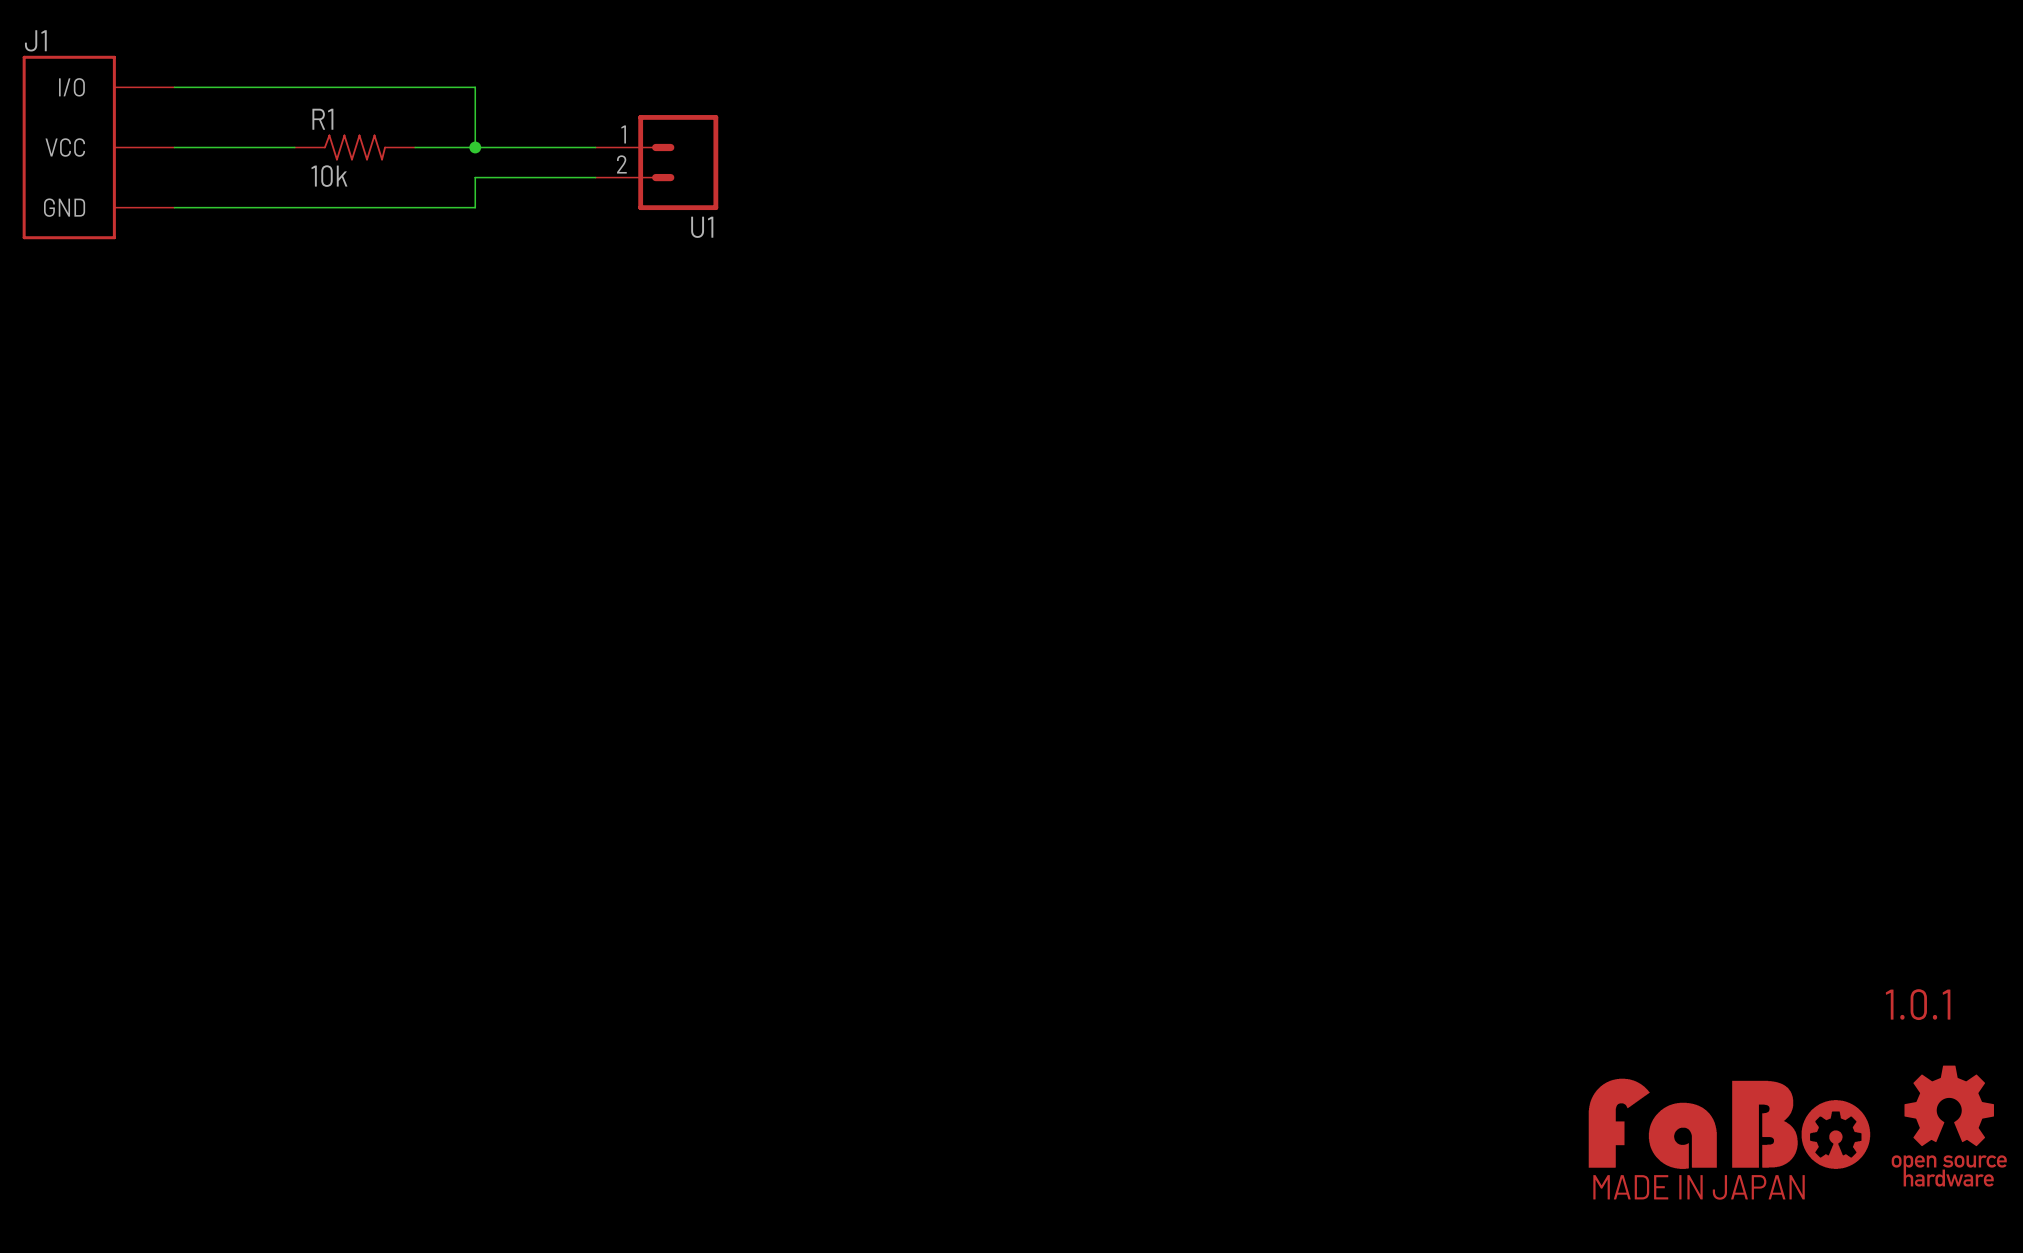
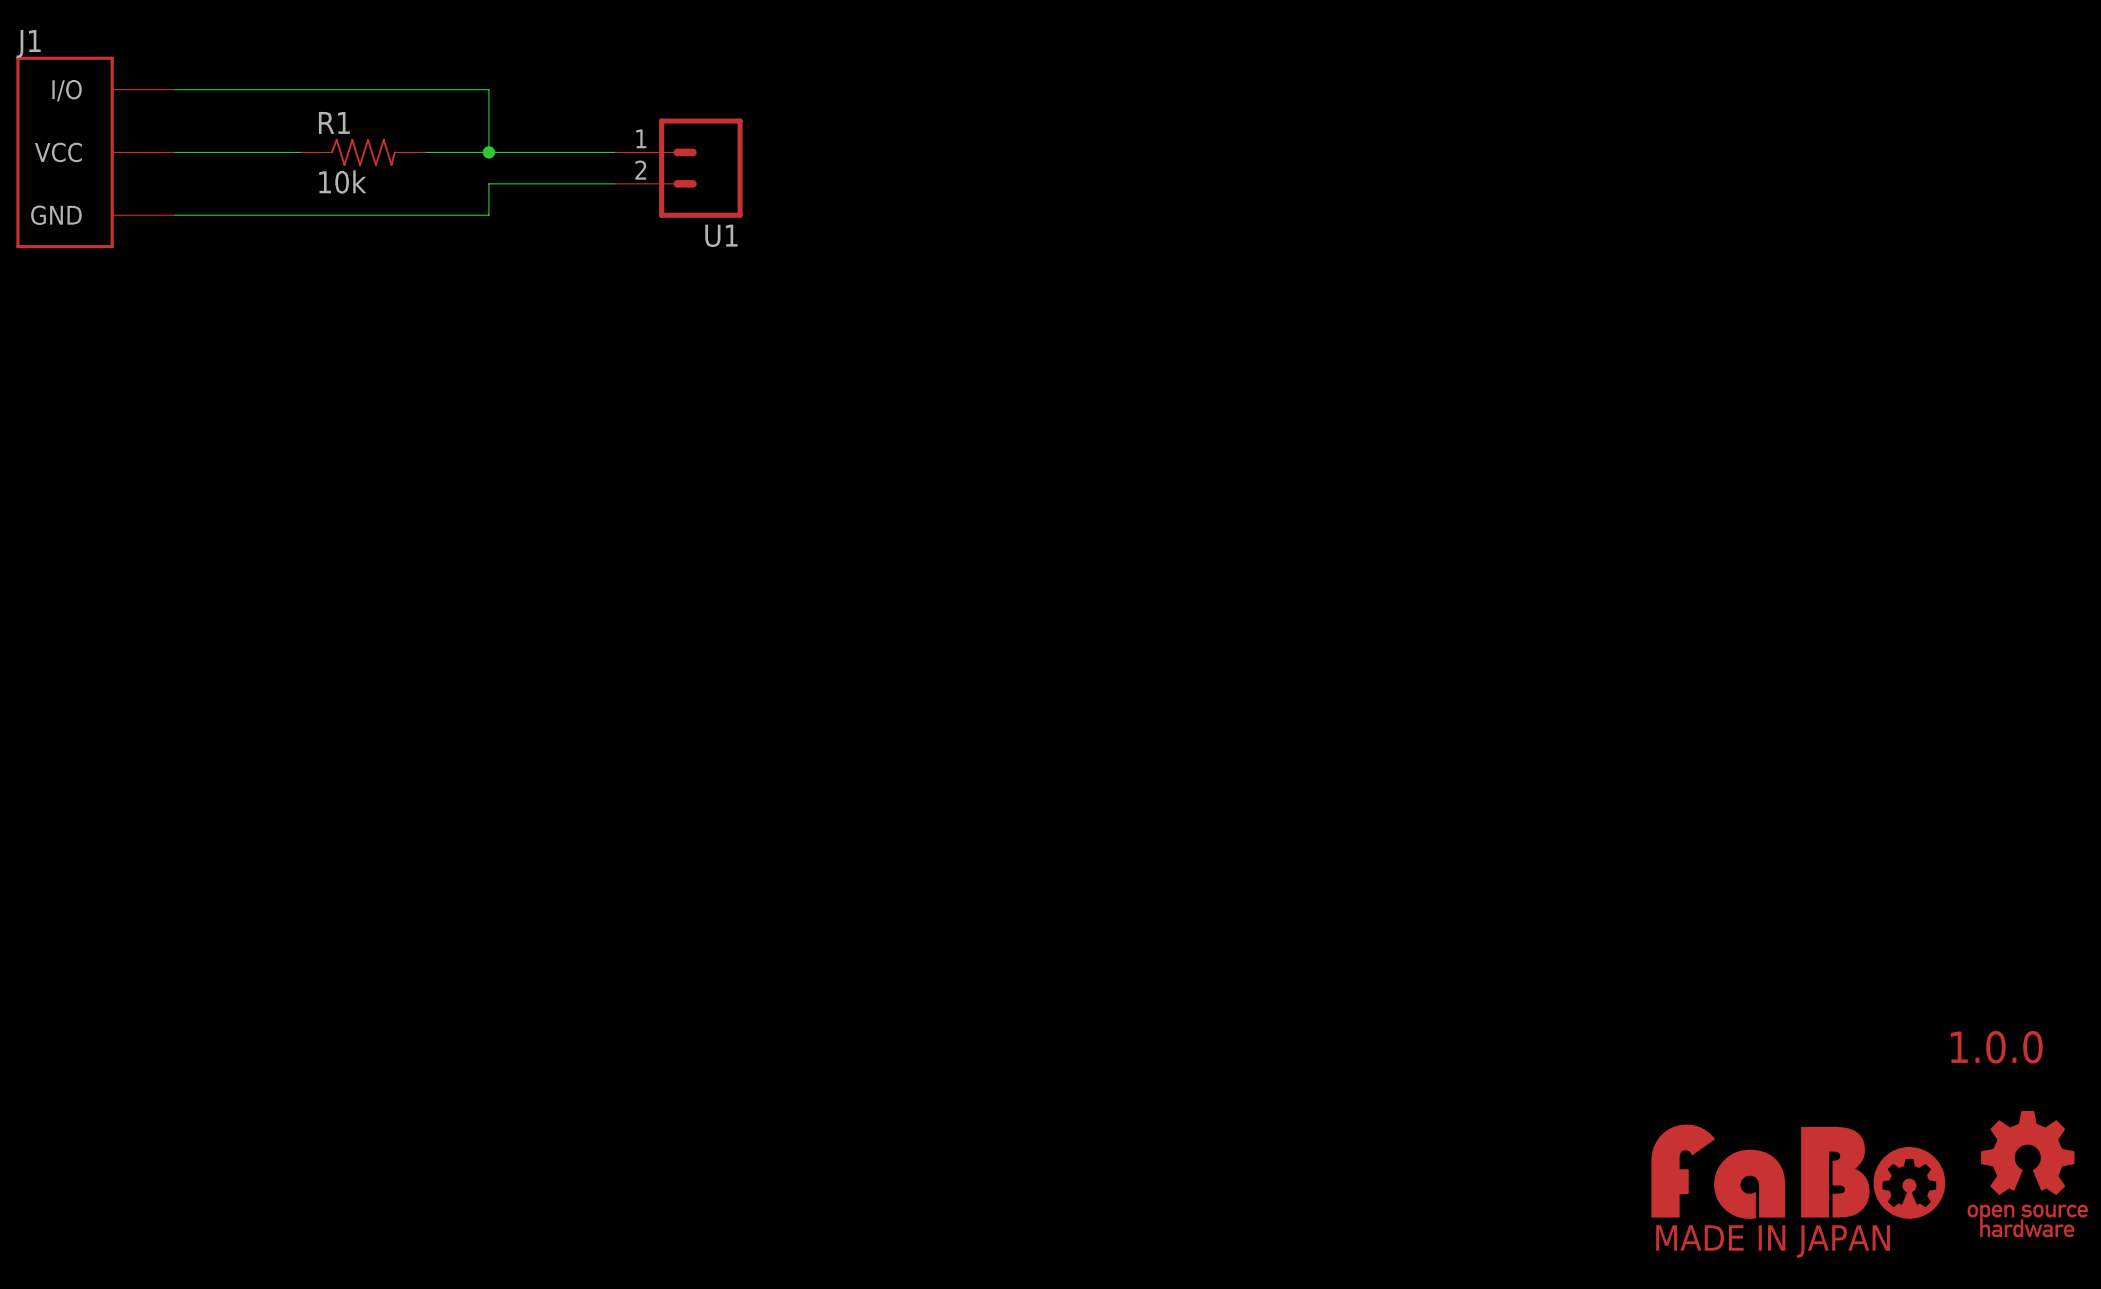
text: 1.0.1 (1918, 1004) -> 1.0.0 (1996, 1047)

